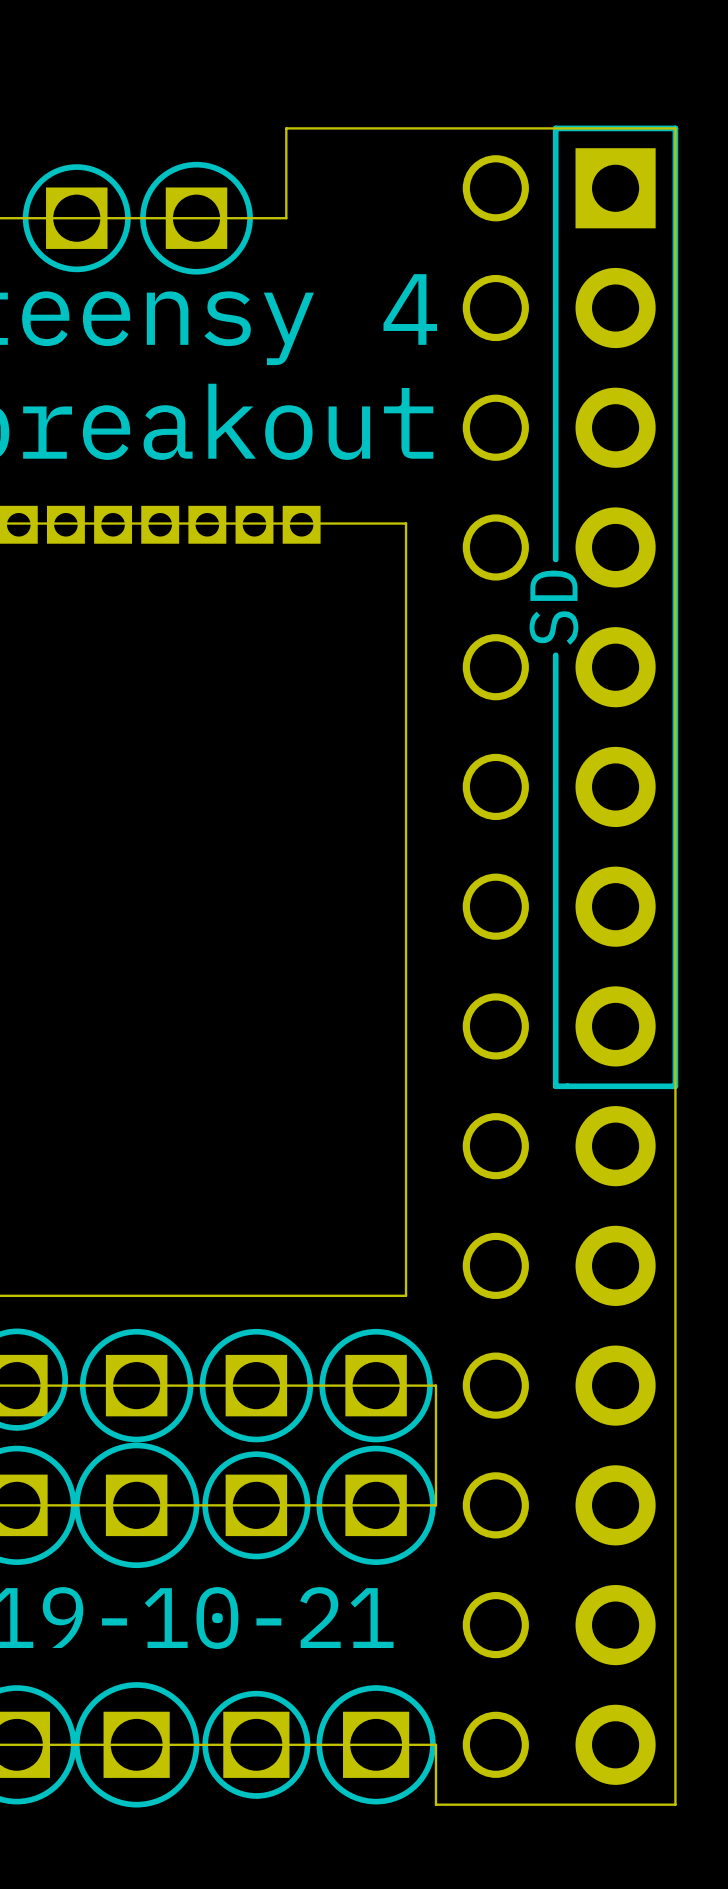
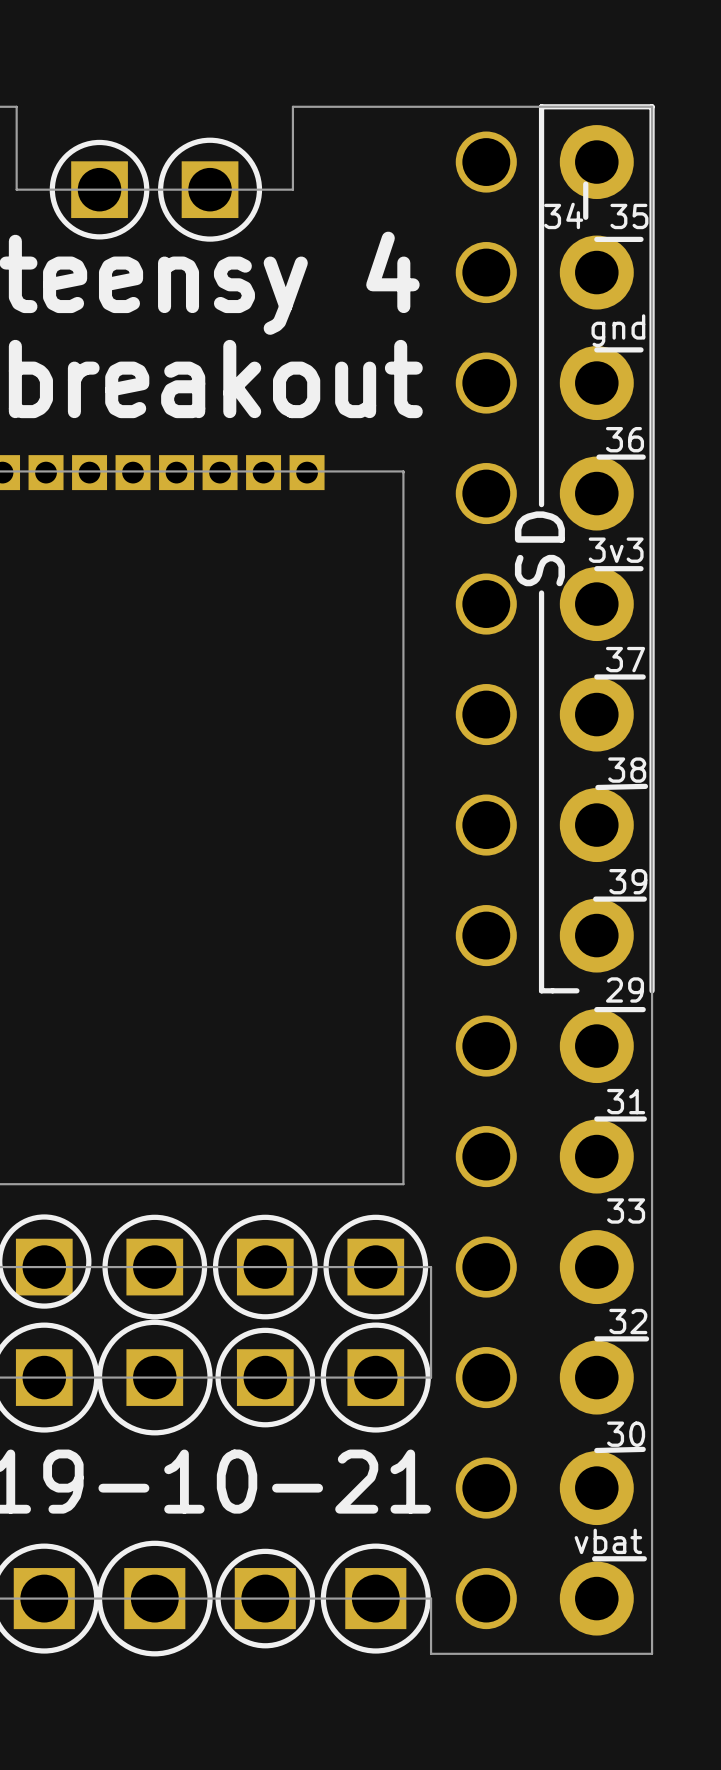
part footprint: [575, 148, 656, 1785] -> [559, 125, 634, 1636]
line: none -> (585, 184) (585, 217)
text: none -> 34 (563, 215)
text: none -> 35 (629, 216)
line: none -> (641, 239) (596, 239)
text: none -> gnd (618, 330)
line: none -> (641, 349) (596, 349)
text: none -> 36 (625, 439)
line: none -> (643, 457) (599, 457)
text: none -> 3v3 (616, 550)
line: none -> (641, 568) (596, 568)
text: none -> 37 (625, 659)
line: none -> (643, 676) (596, 676)
text: none -> 38 (627, 770)
line: none -> (645, 786) (597, 787)
text: none -> 39 (628, 881)
line: none -> (644, 899) (595, 899)
text: none -> 29 (625, 989)
line: (675, 1086) (594, 1086) -> none
line: none -> (643, 1009) (596, 1009)
text: none -> 31 (626, 1101)
line: none -> (644, 1118) (596, 1118)
text: none -> 33 (626, 1210)
text: none -> 32 (628, 1321)
line: none -> (646, 1338) (596, 1338)
text: none -> 30 (626, 1434)
line: none -> (643, 1449) (596, 1450)
text: none -> vbat (608, 1541)
line: none -> (644, 1558) (594, 1558)

